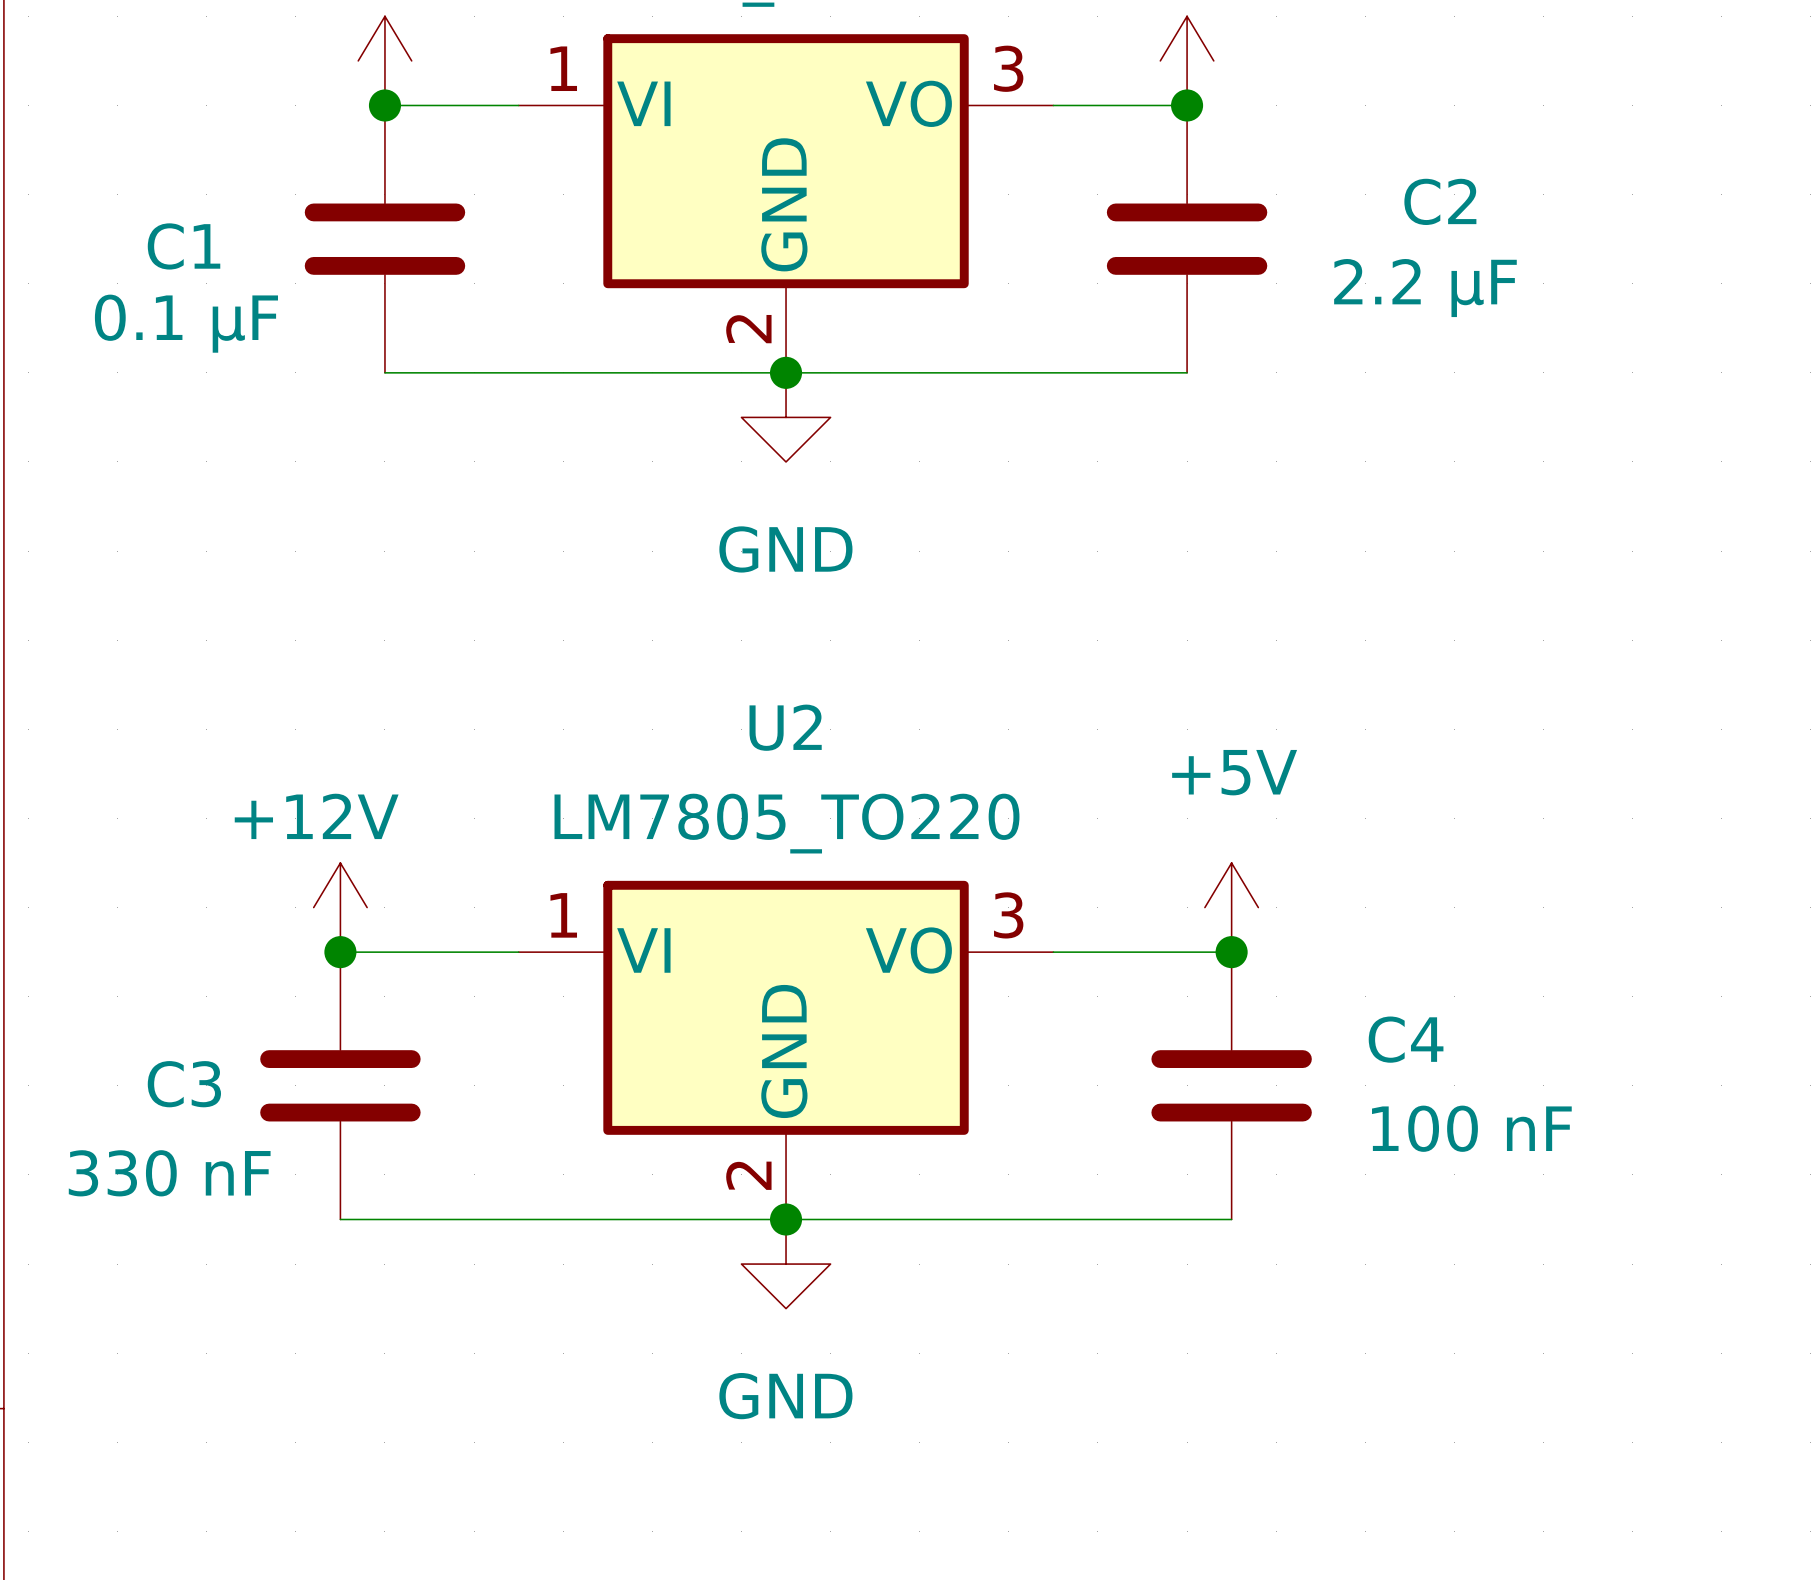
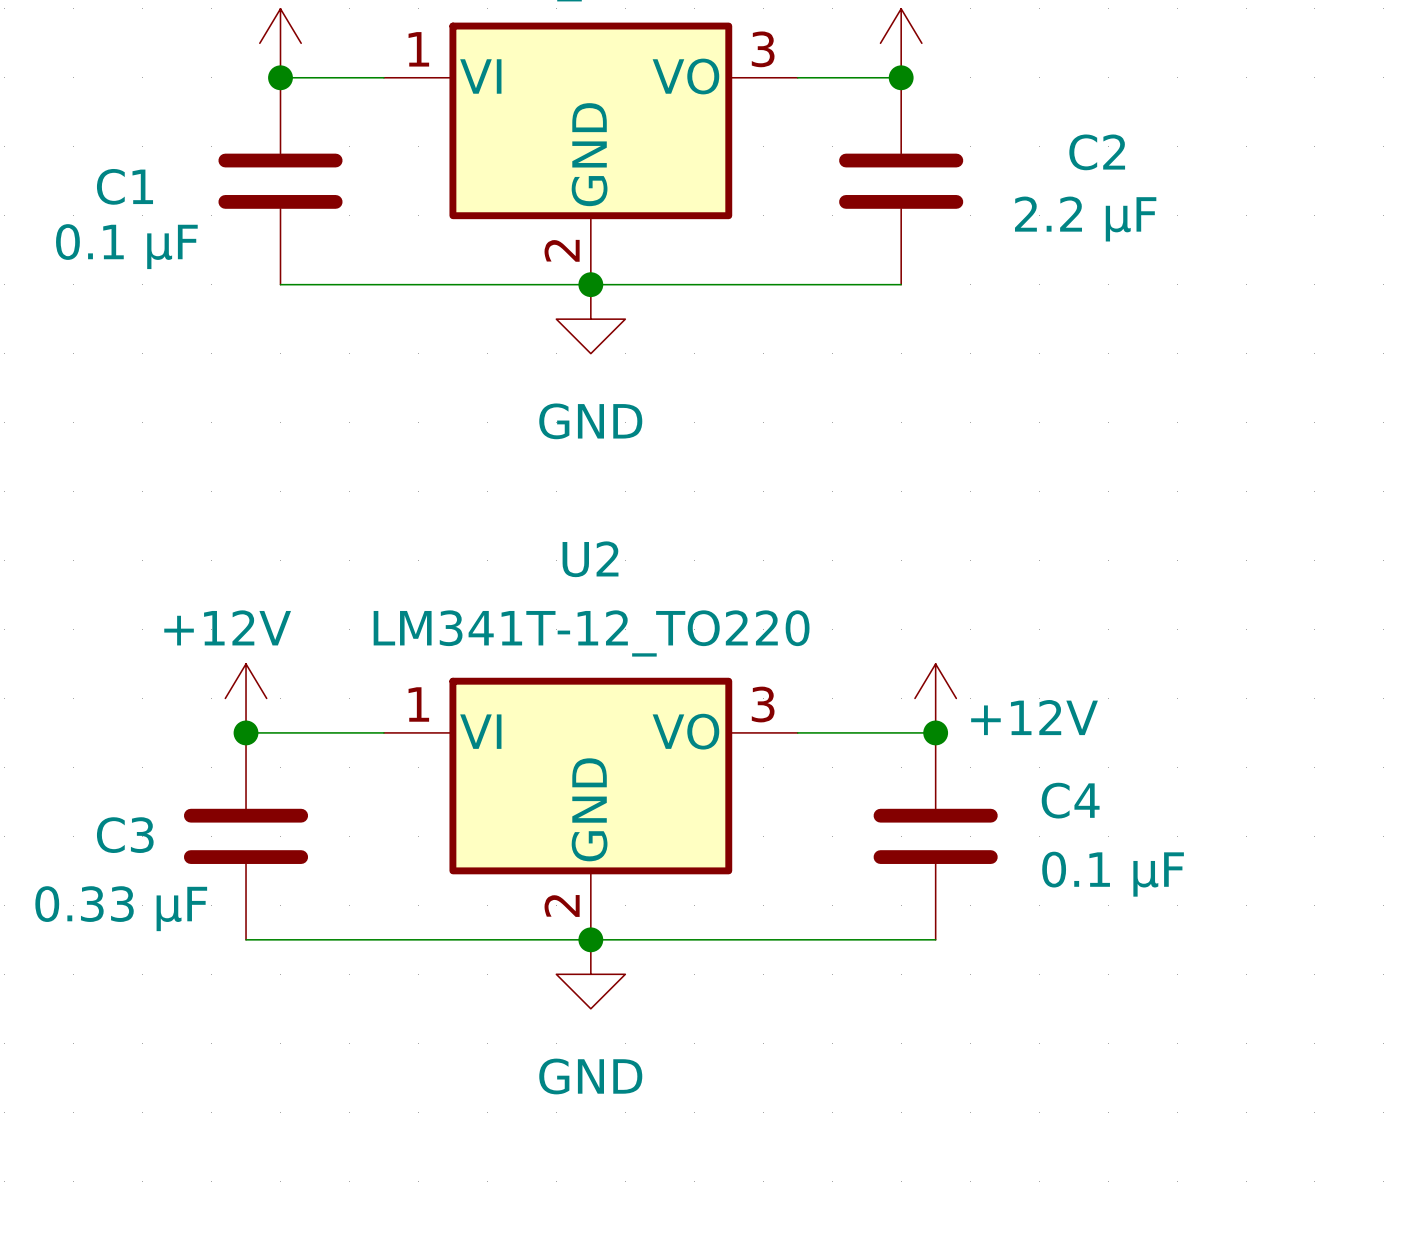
U2 value: LM7805_TO220 (786, 823) -> LM341T-12_TO220 (591, 633)
power symbol: +5V (1231, 907) -> +12V (935, 698)
C4 value: 100 nF (1471, 1128) -> 0.1 µF (1113, 874)
C3 value: 330 nF (169, 1173) -> 0.33 µF (121, 908)

